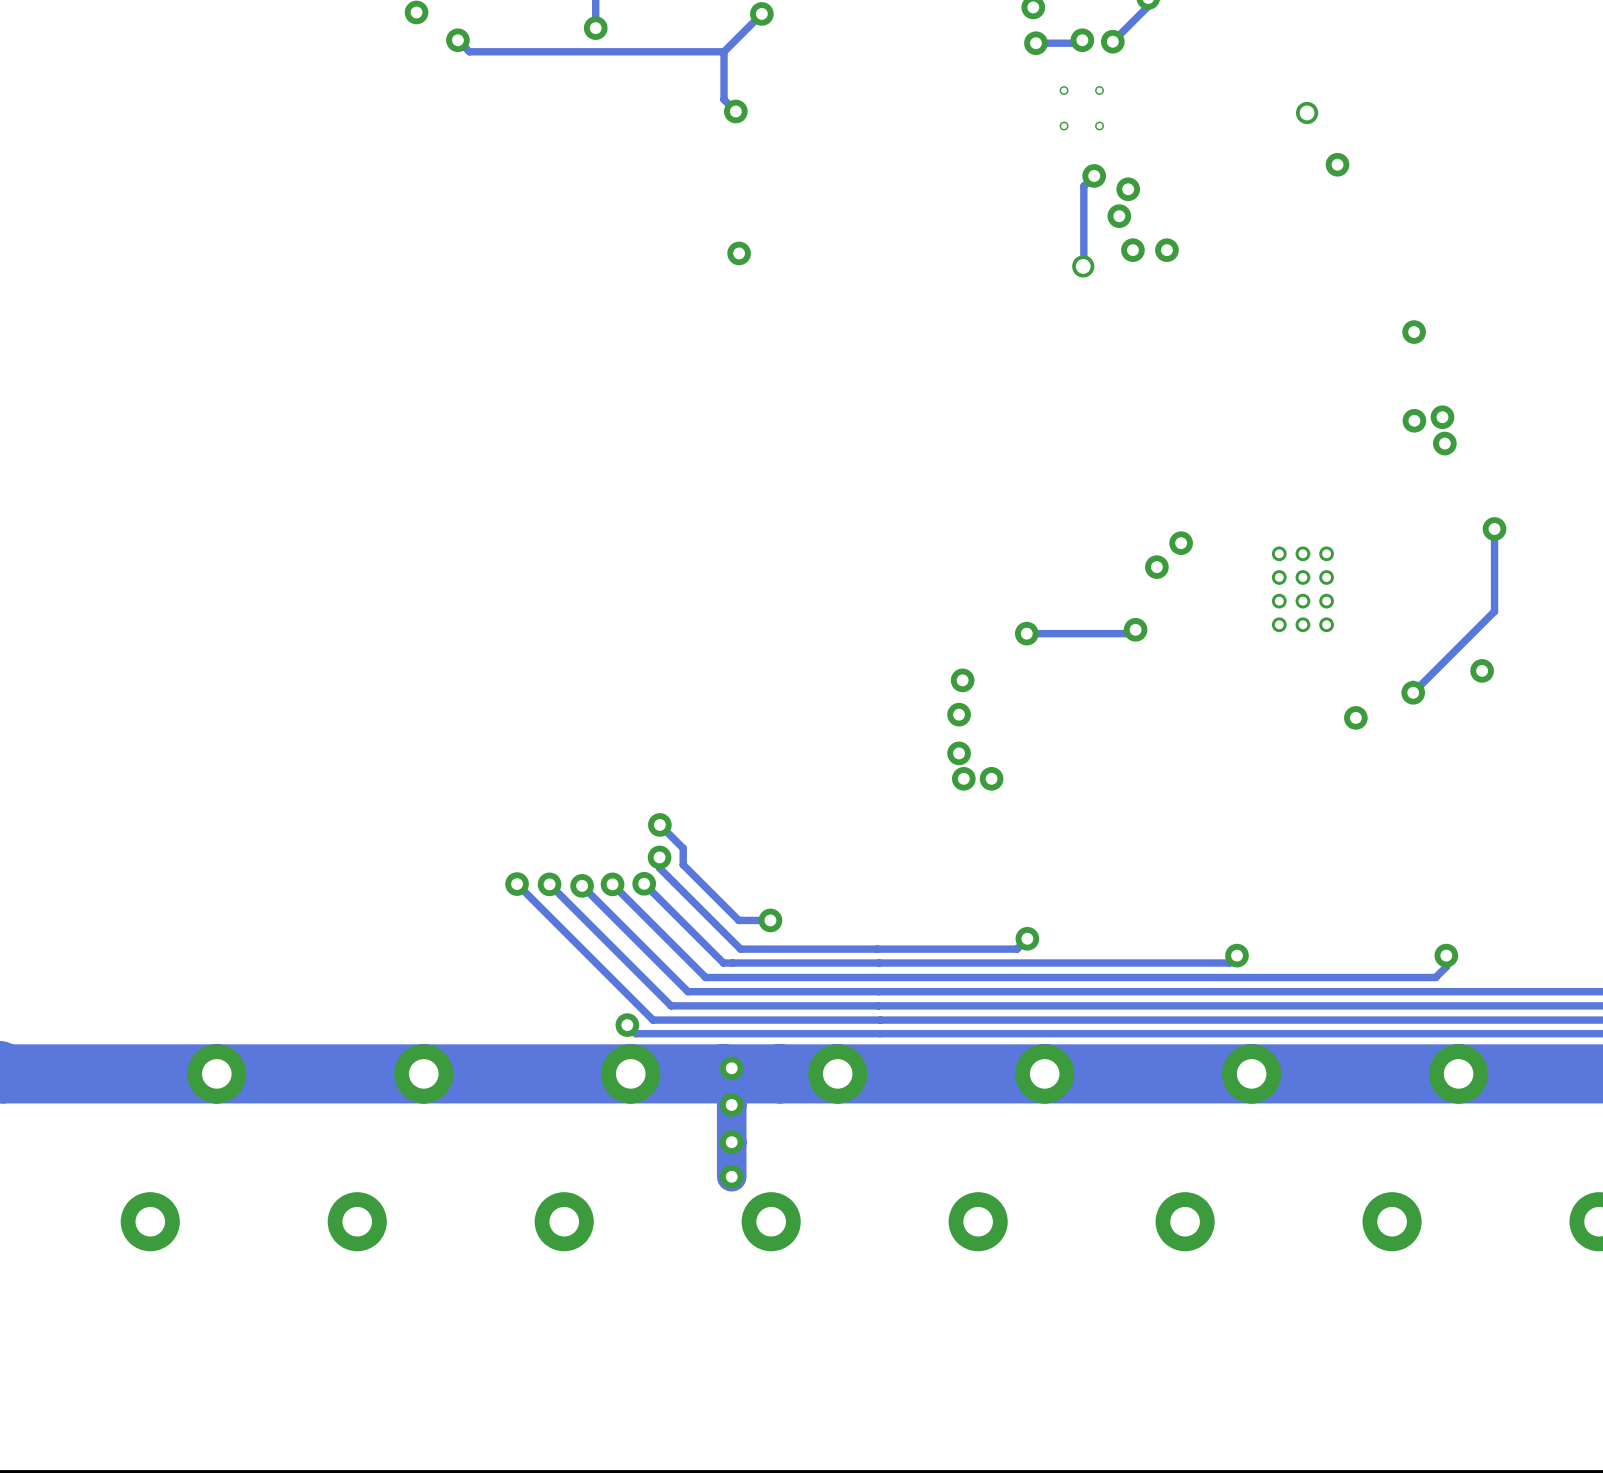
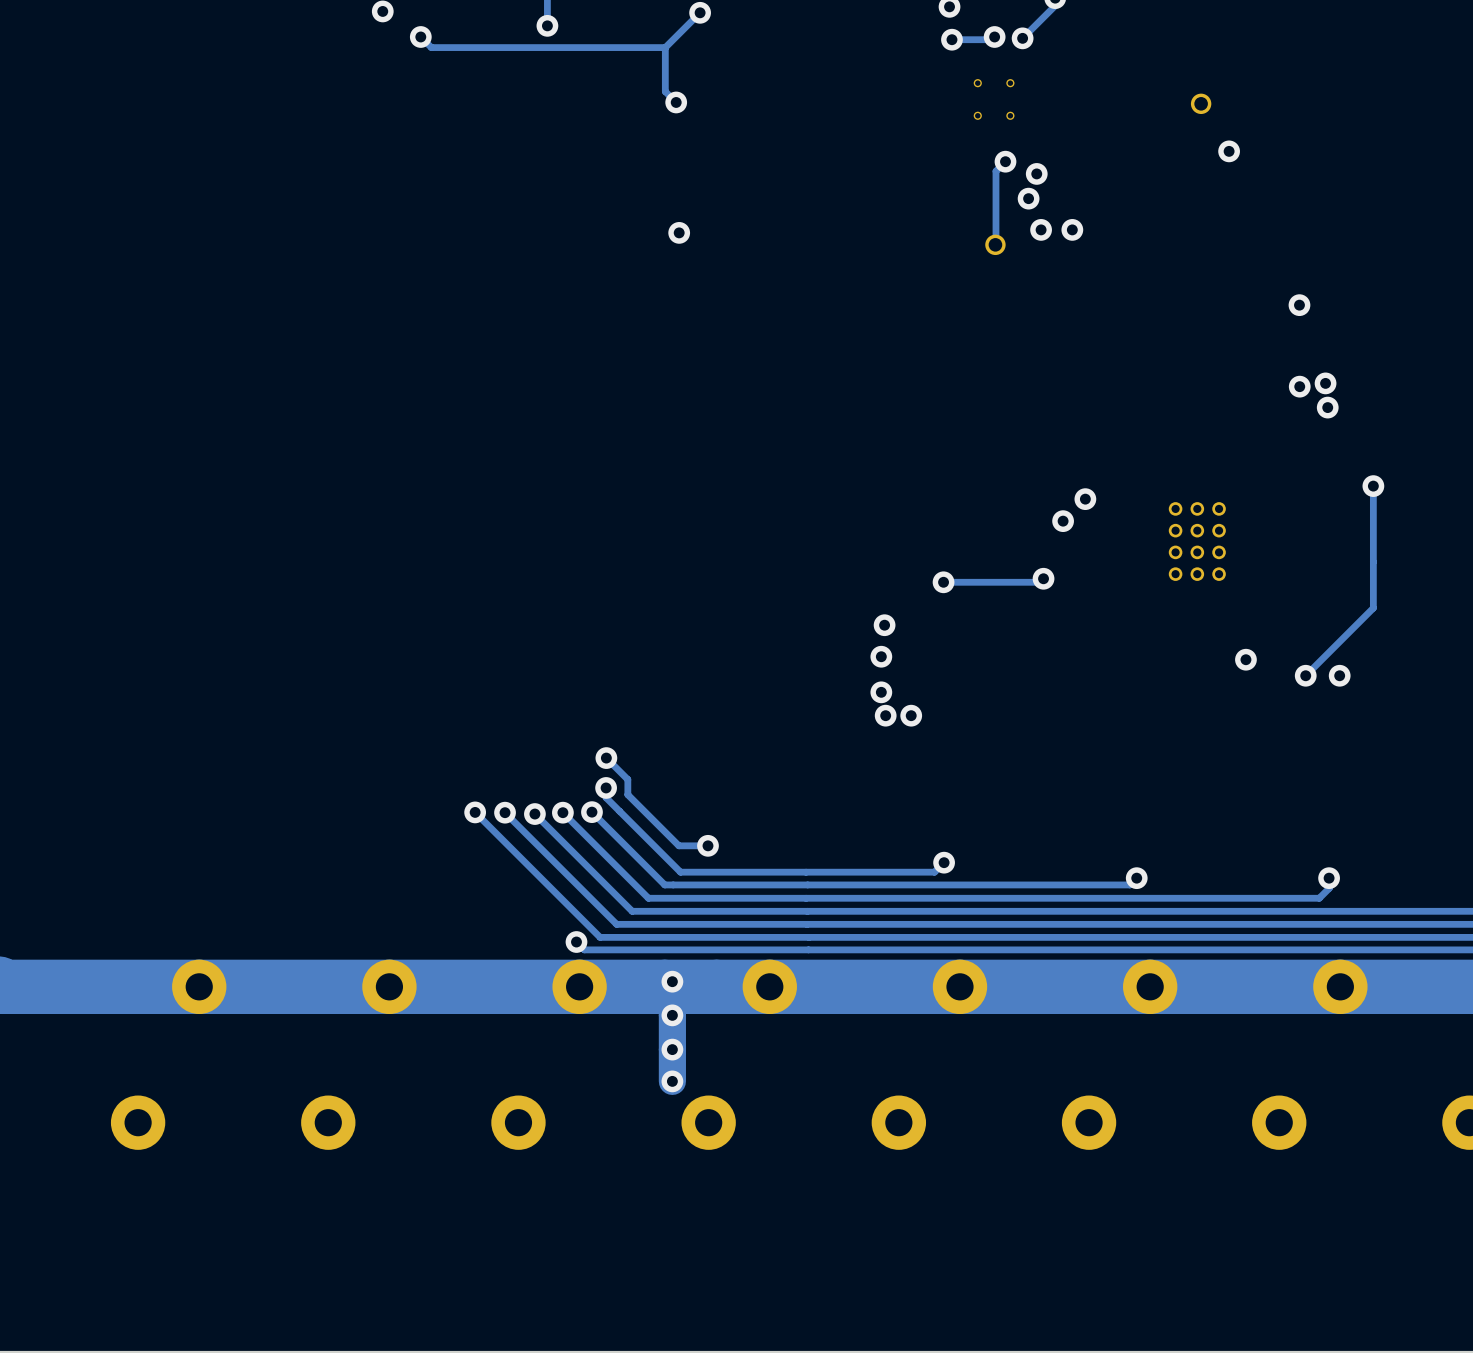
track: (1494, 611) (1413, 692) (1413, 684) -> (1373, 561) (1373, 608) (1305, 675)
via: (1482, 670) -> none
via: (1413, 692) -> none
via: none -> (1305, 675)
via: none -> (1339, 675)

